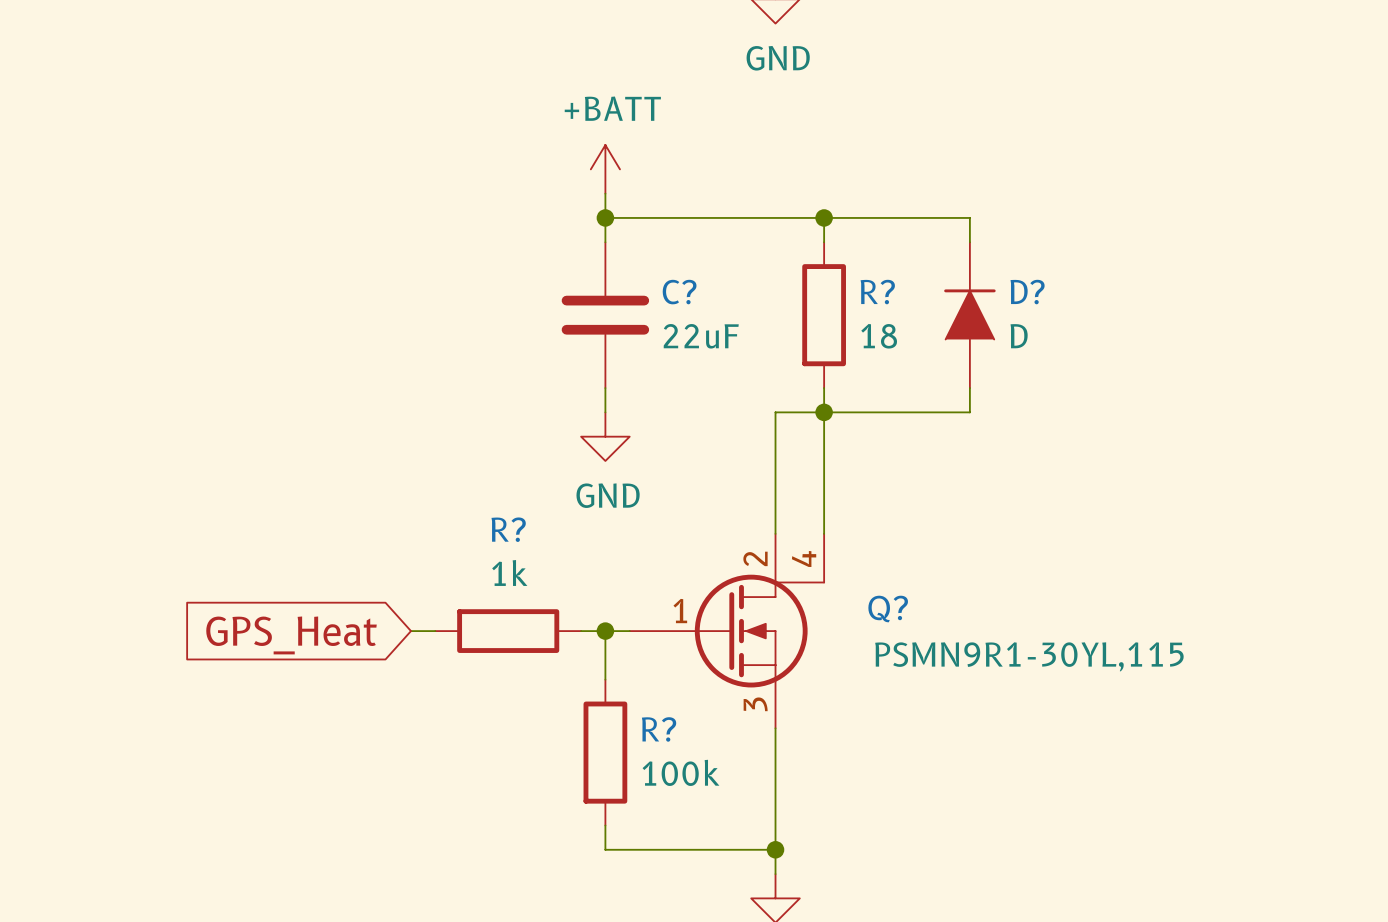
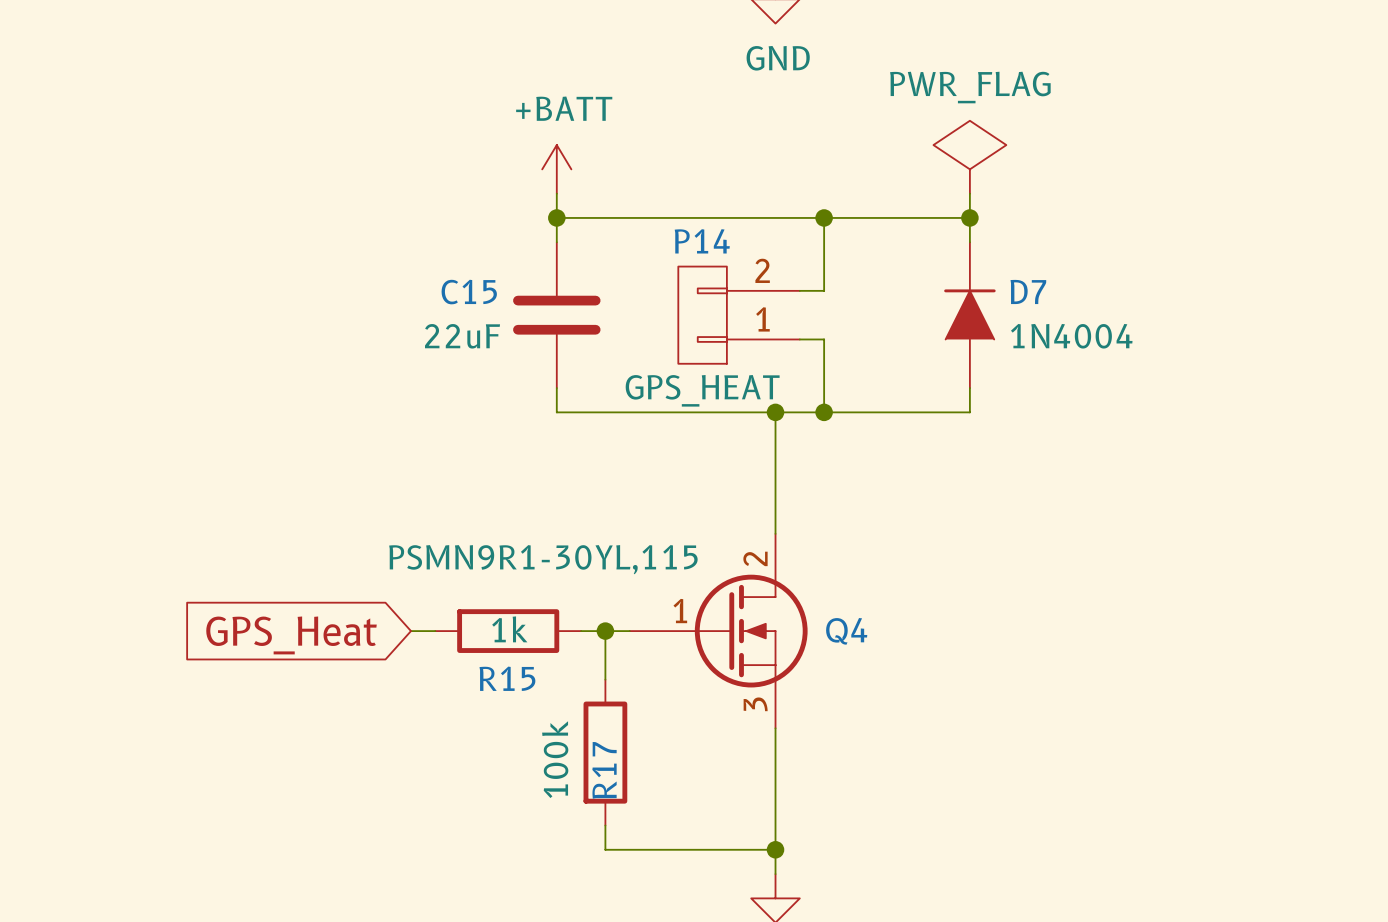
power symbol: none -> PWR_FLAG (969, 157)
power symbol position: +BATT (605, 169) -> +BATT (556, 169)
wire: (605, 193) (605, 242) -> (556, 193) (556, 242)
wire: none -> (556, 217) (605, 217)
junction position: (605, 217) -> (556, 217)
junction: none -> (969, 217)
wire: none -> (824, 242) (824, 290) (799, 290)
D? name: D? (1027, 292) -> D7 (1028, 291)
C15: none -> 22uF (556, 315)
C?: 22uF (605, 315) -> none
P14: none -> GPS_HEAT (739, 315)
R?: 18 (824, 315) -> none
D? value: D (1019, 336) -> 1N4004 (1071, 336)
wire: none -> (799, 339) (824, 339) (824, 388)
wire: none -> (556, 388) (556, 412) (775, 412)
wire: (605, 388) (605, 412) -> (969, 193) (969, 217)
junction: none -> (775, 412)
wire: (824, 412) (824, 533) -> none
power symbol: GND (605, 436) -> none
R? name: R? (508, 529) -> R15 (507, 678)
R? value position: 1k (509, 572) -> 1k (509, 629)
Q4: none -> PSMN9R1-30YL,115 (718, 631)
Q?: PSMN9R1-30YL,115 (726, 631) -> none
R? name: R? (659, 729) -> R17 (604, 770)
R? value rotation: 0° (680, 772) -> 90° counterclockwise (555, 759)
R? value position: 100k (680, 772) -> 100k (555, 759)

